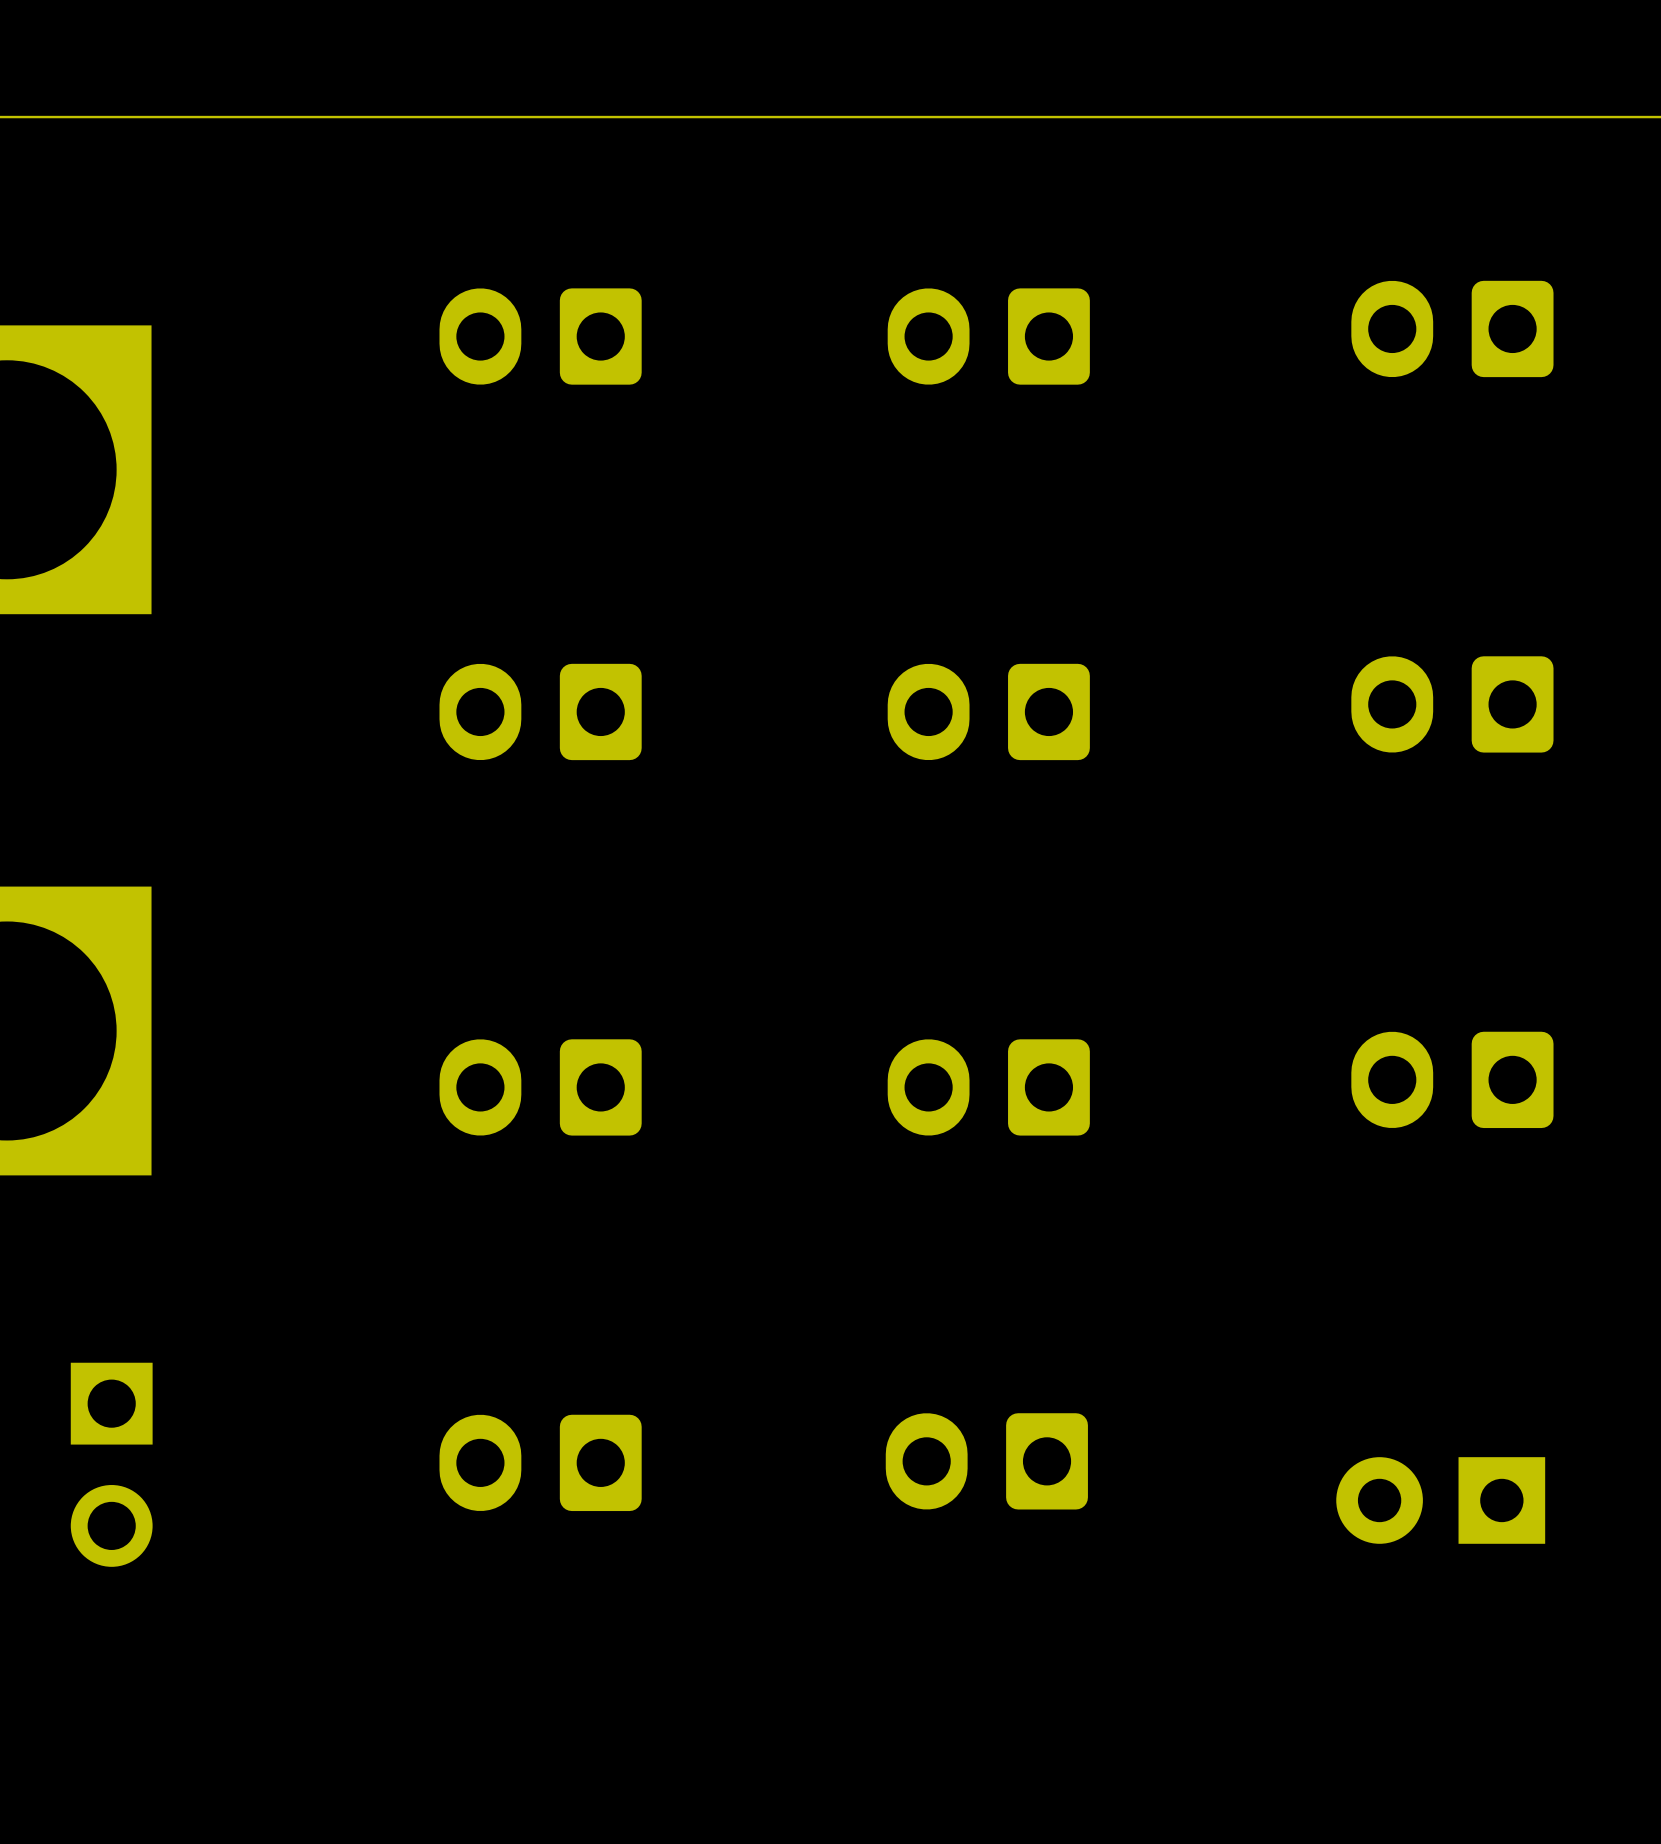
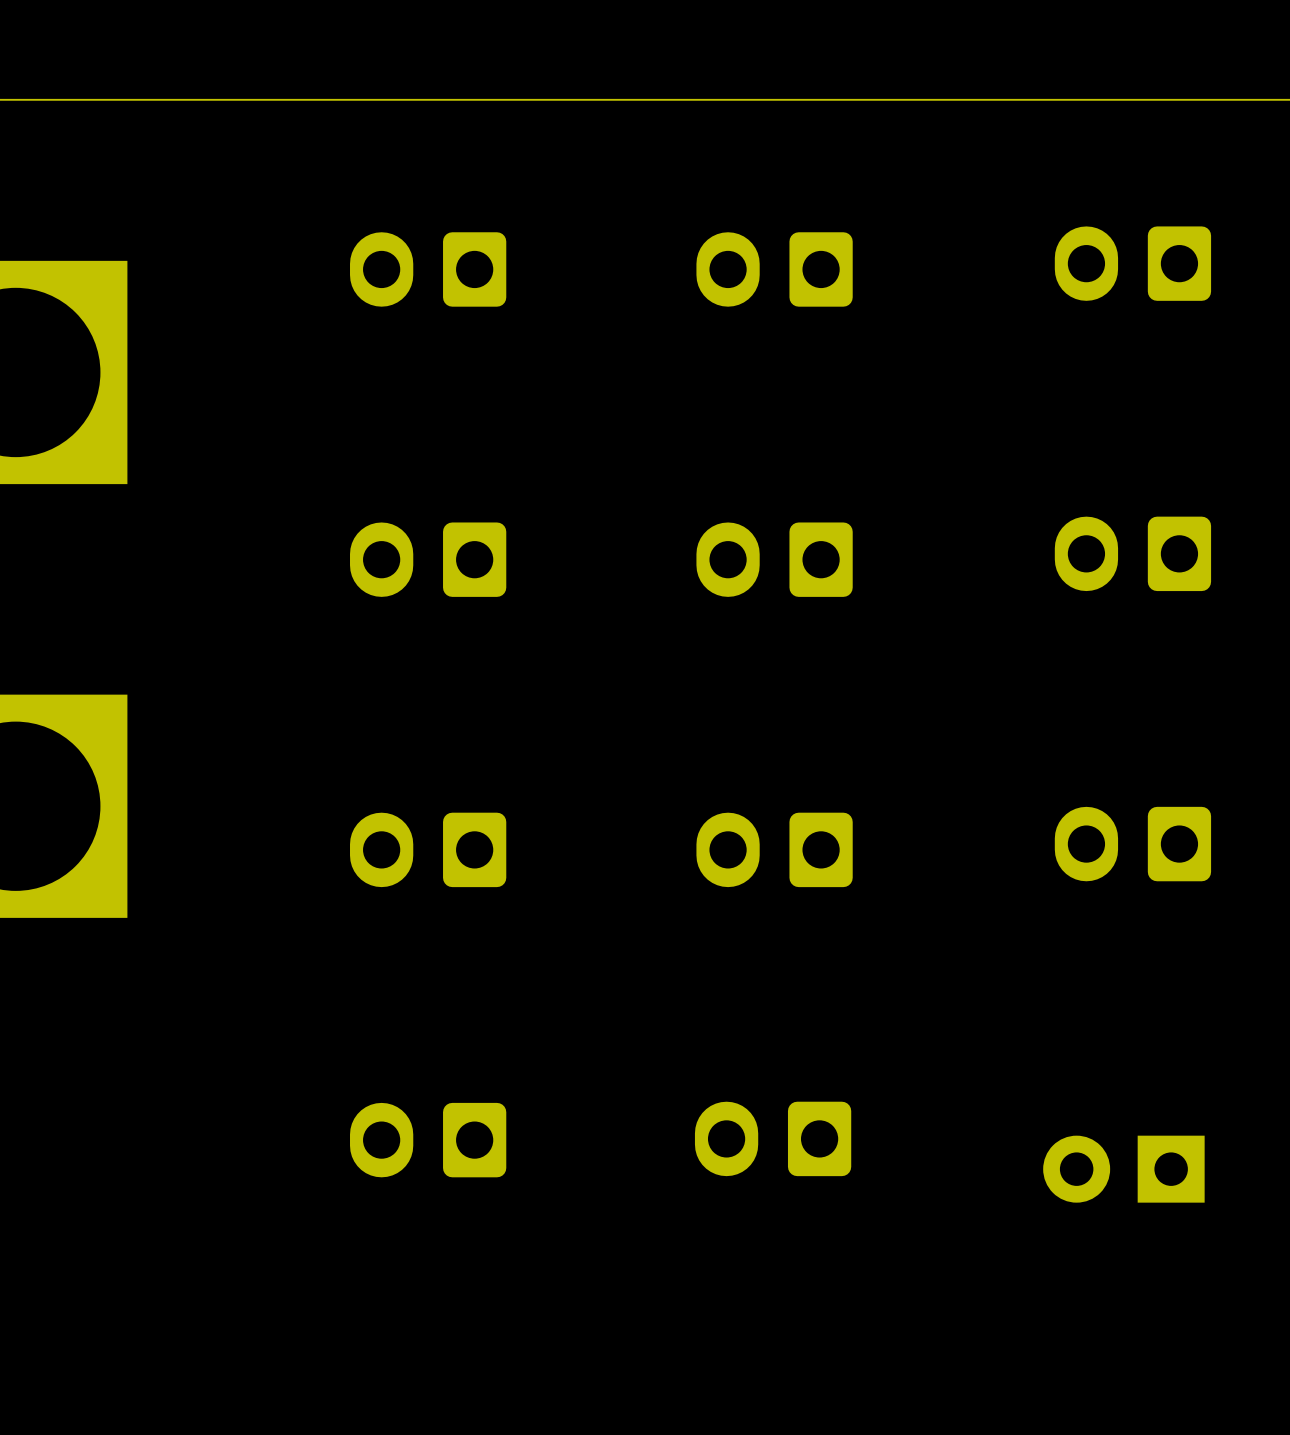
part: (111, 1464) -> none

